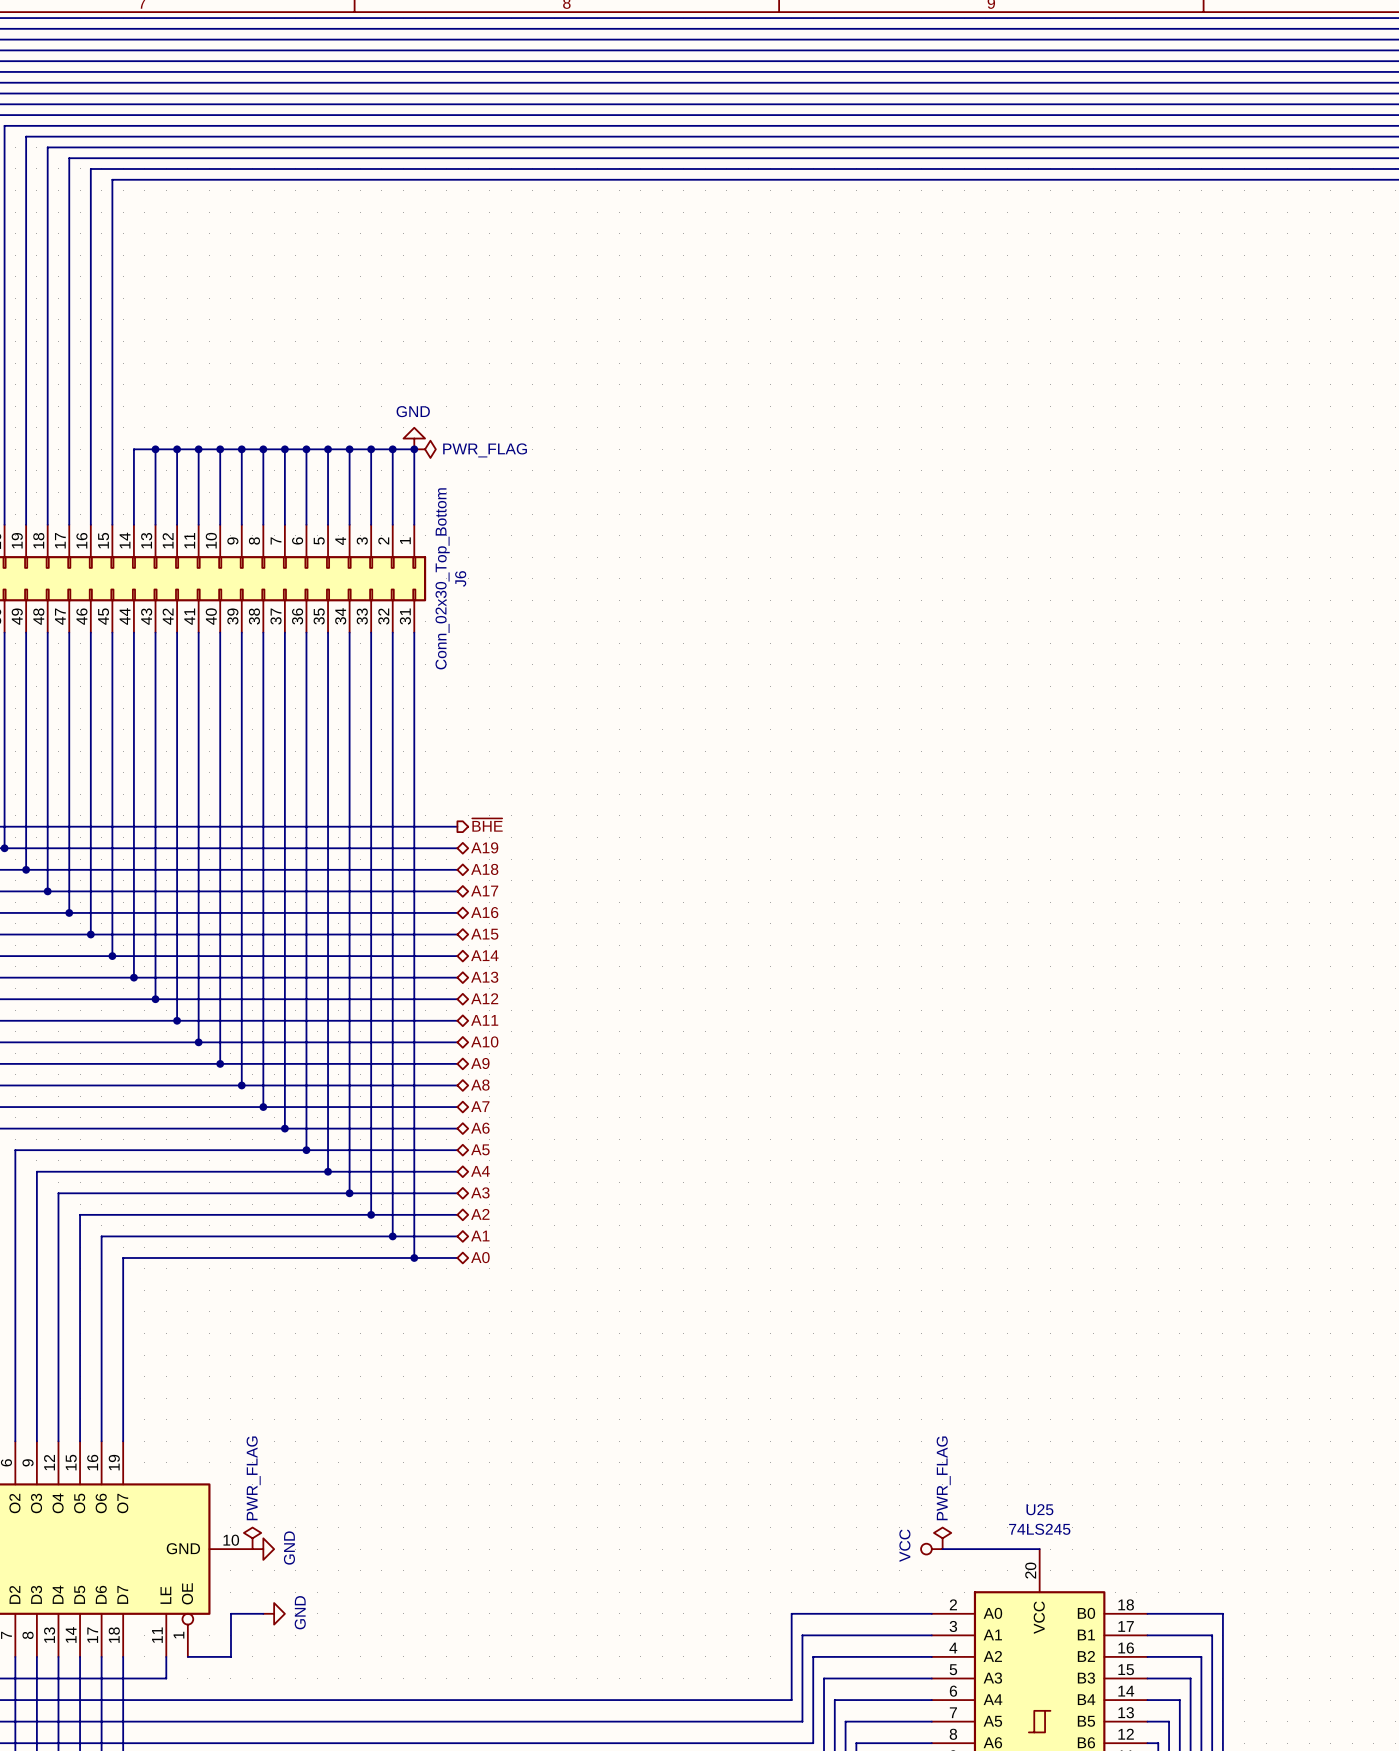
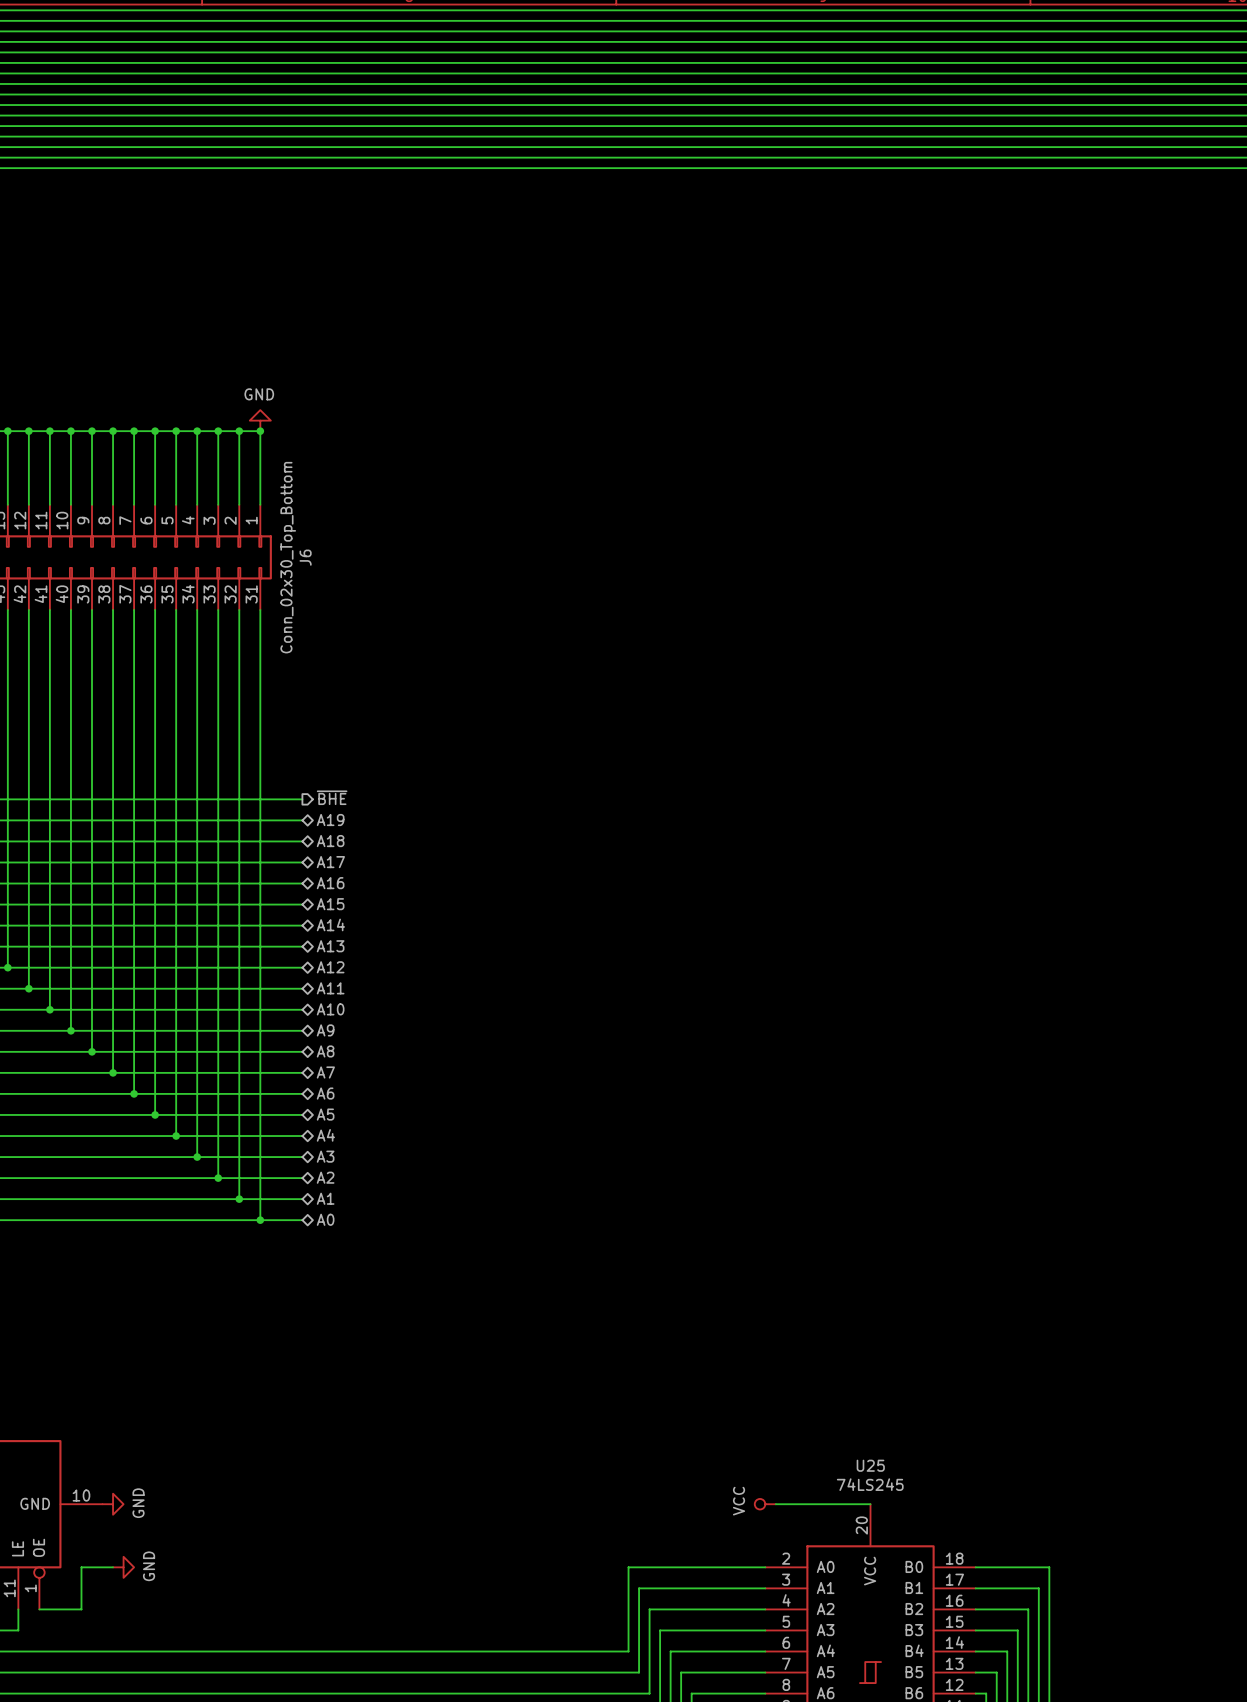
power symbol: PWR_FLAG (425, 449) -> none
power symbol: PWR_FLAG (252, 1538) -> none
power symbol: PWR_FLAG (942, 1538) -> none

